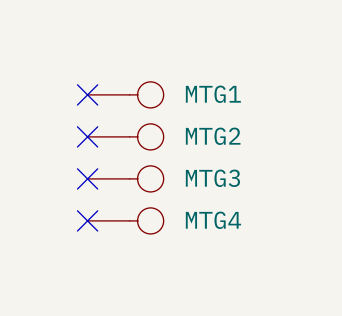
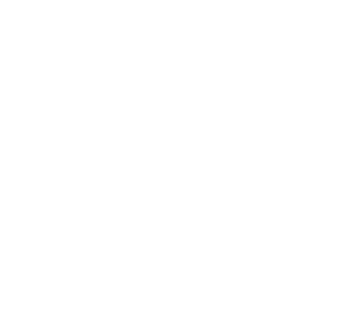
no-connect mark: (87, 94) -> none
MTG1: (125, 94) -> none
no-connect mark: (87, 136) -> none
MTG2: (125, 136) -> none
no-connect mark: (87, 178) -> none
MTG3: (125, 178) -> none
no-connect mark: (87, 220) -> none
MTG4: (125, 220) -> none

